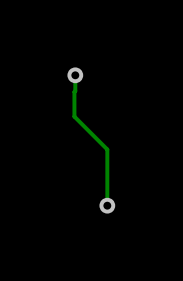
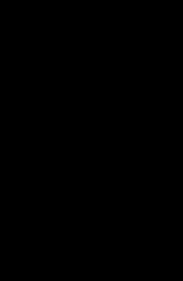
track: (75, 75) (74, 116) (107, 149) (107, 205) -> none
via: (75, 75) -> none
via: (107, 205) -> none

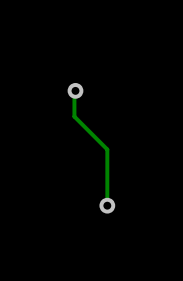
track: none -> (75, 90) (74, 116) (107, 149) (107, 205)
via: none -> (75, 90)
via: none -> (107, 205)

